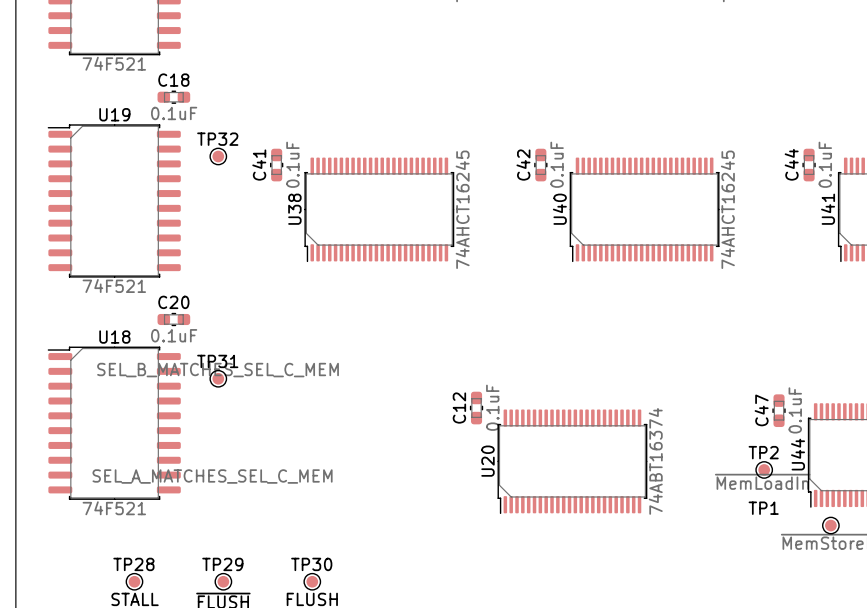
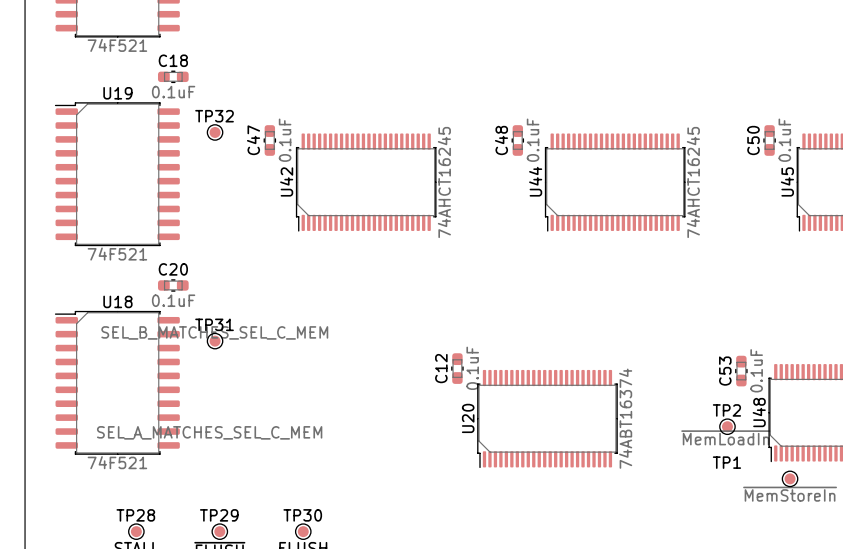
C44 name: C44 (791, 164) -> C50 (753, 140)
C41 name: C41 (259, 165) -> C47 (253, 140)
C42 name: C42 (523, 165) -> C48 (501, 140)
U38 name: U38 (294, 209) -> U42 (286, 181)
U40 name: U40 (559, 209) -> U44 (535, 181)
U41 name: U41 (828, 209) -> U45 (787, 181)
C47 name: C47 (761, 410) -> C53 (725, 371)
U44 name: U44 (798, 454) -> U48 (759, 412)

